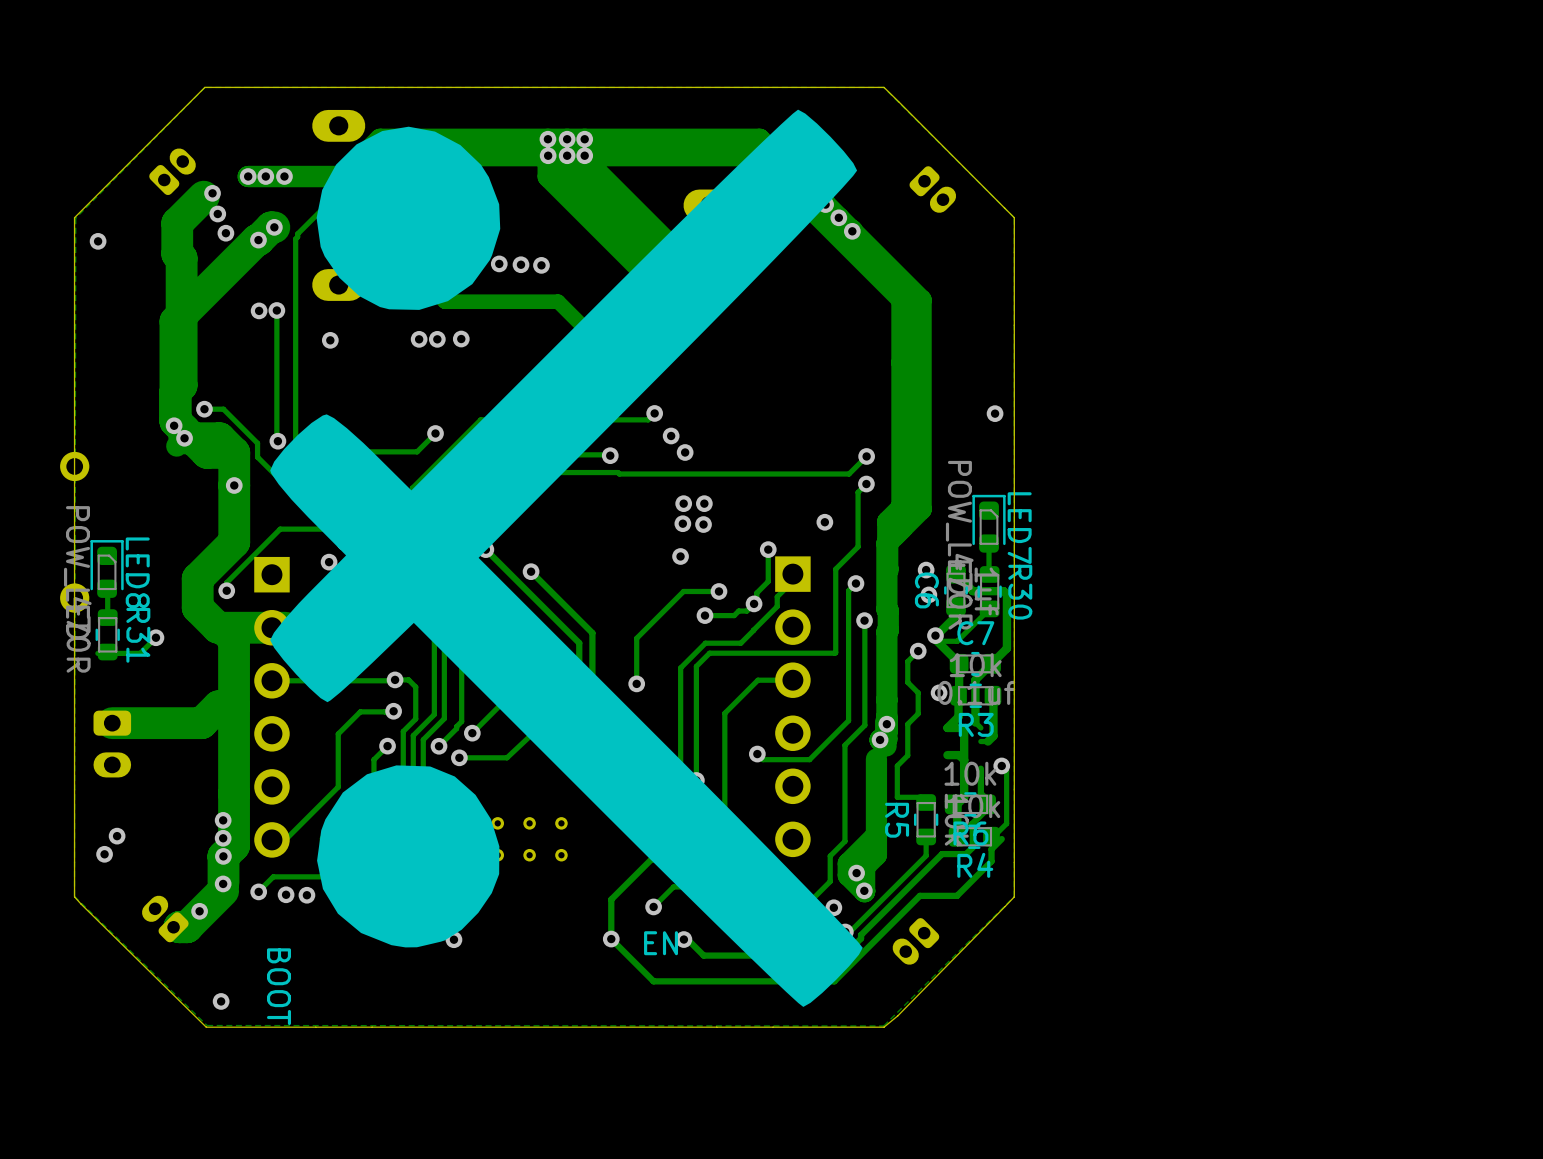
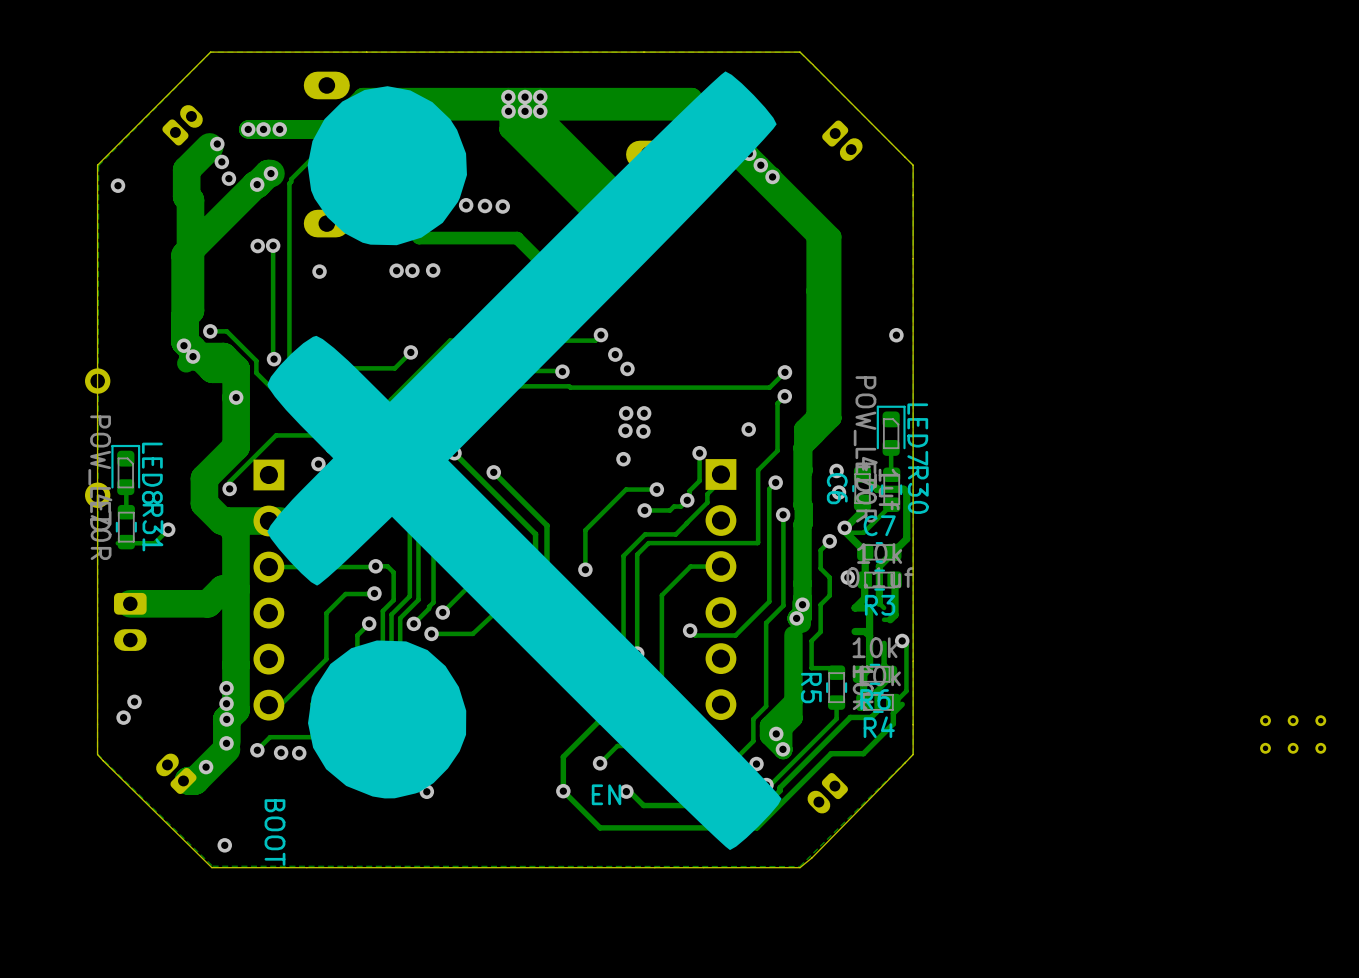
part: (529, 839) -> none
part: none -> (1293, 734)

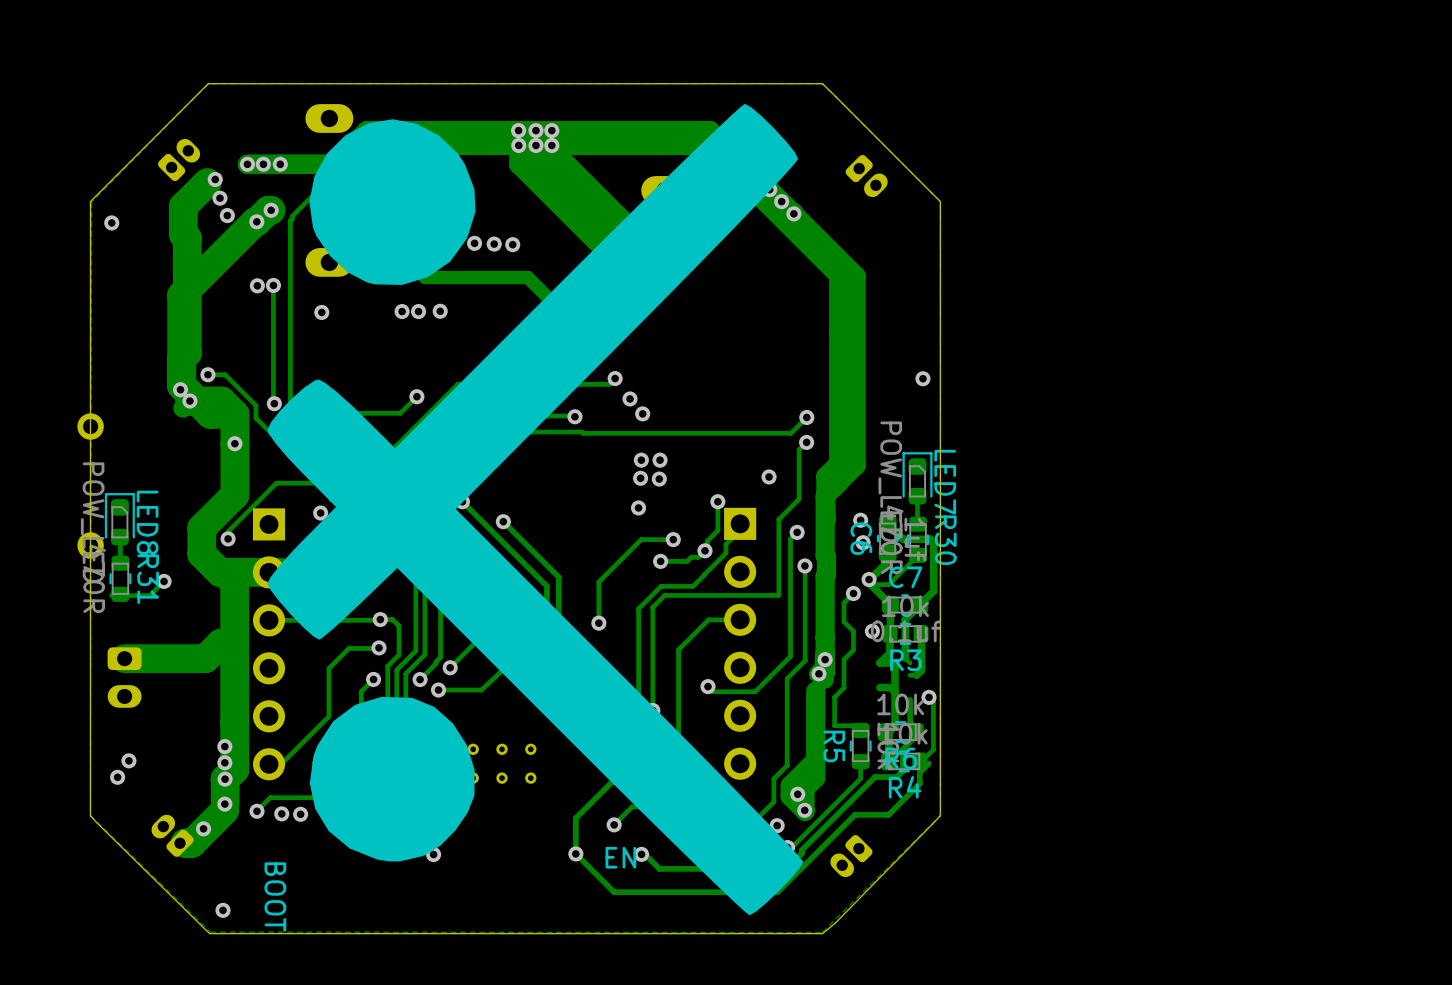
part: none -> (502, 763)
part: (1293, 734) -> none

